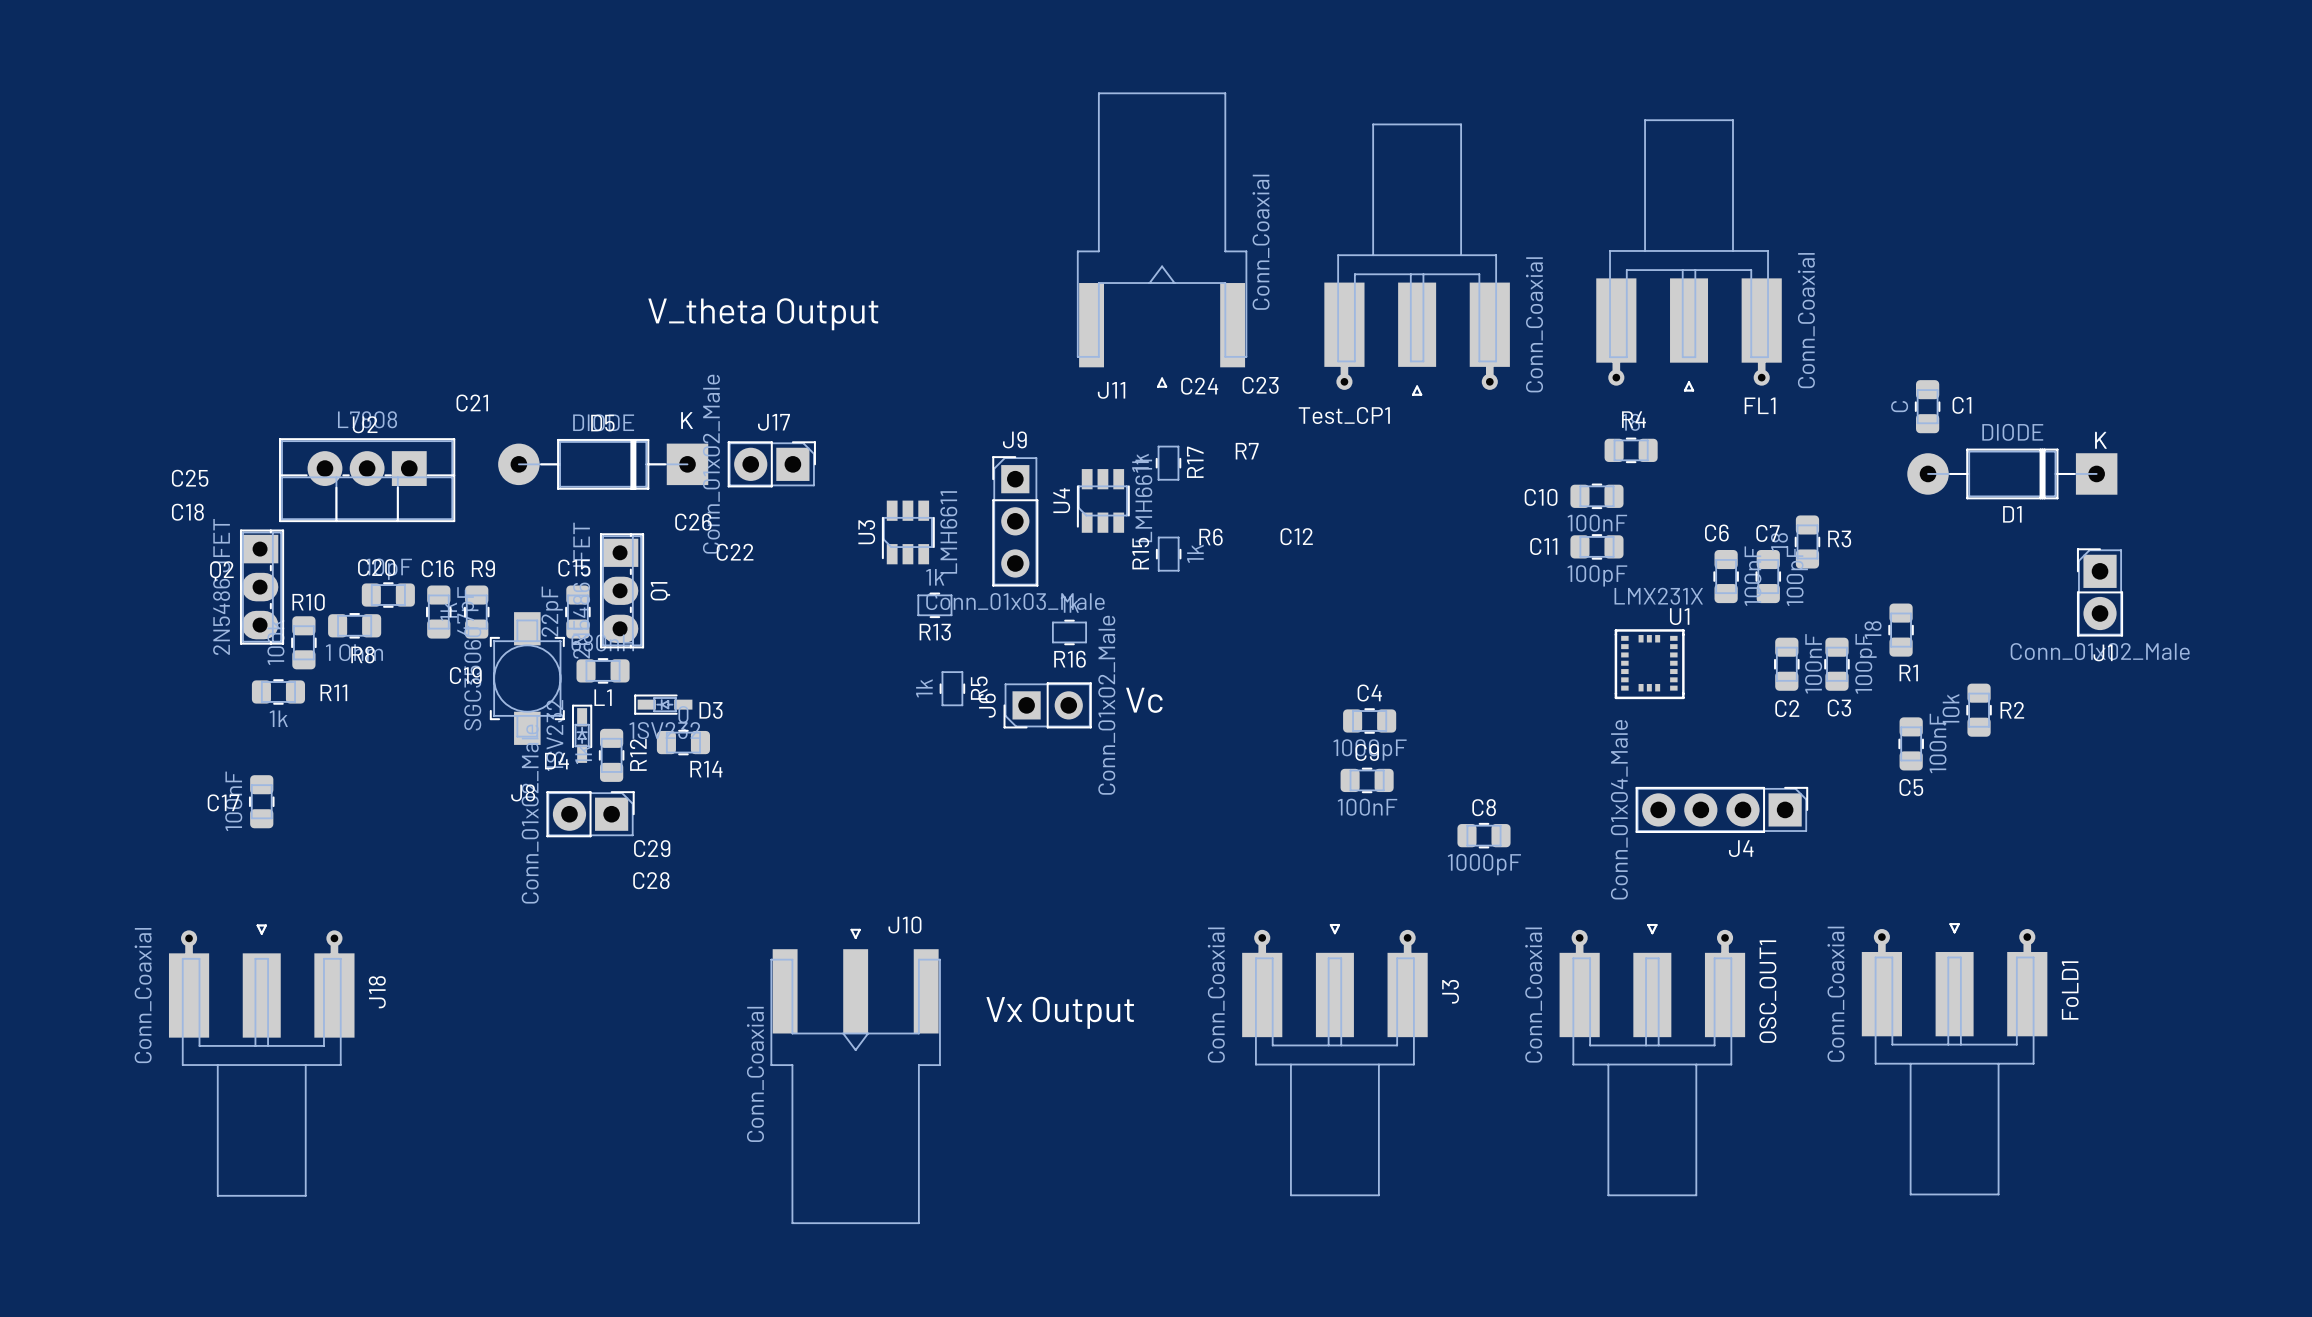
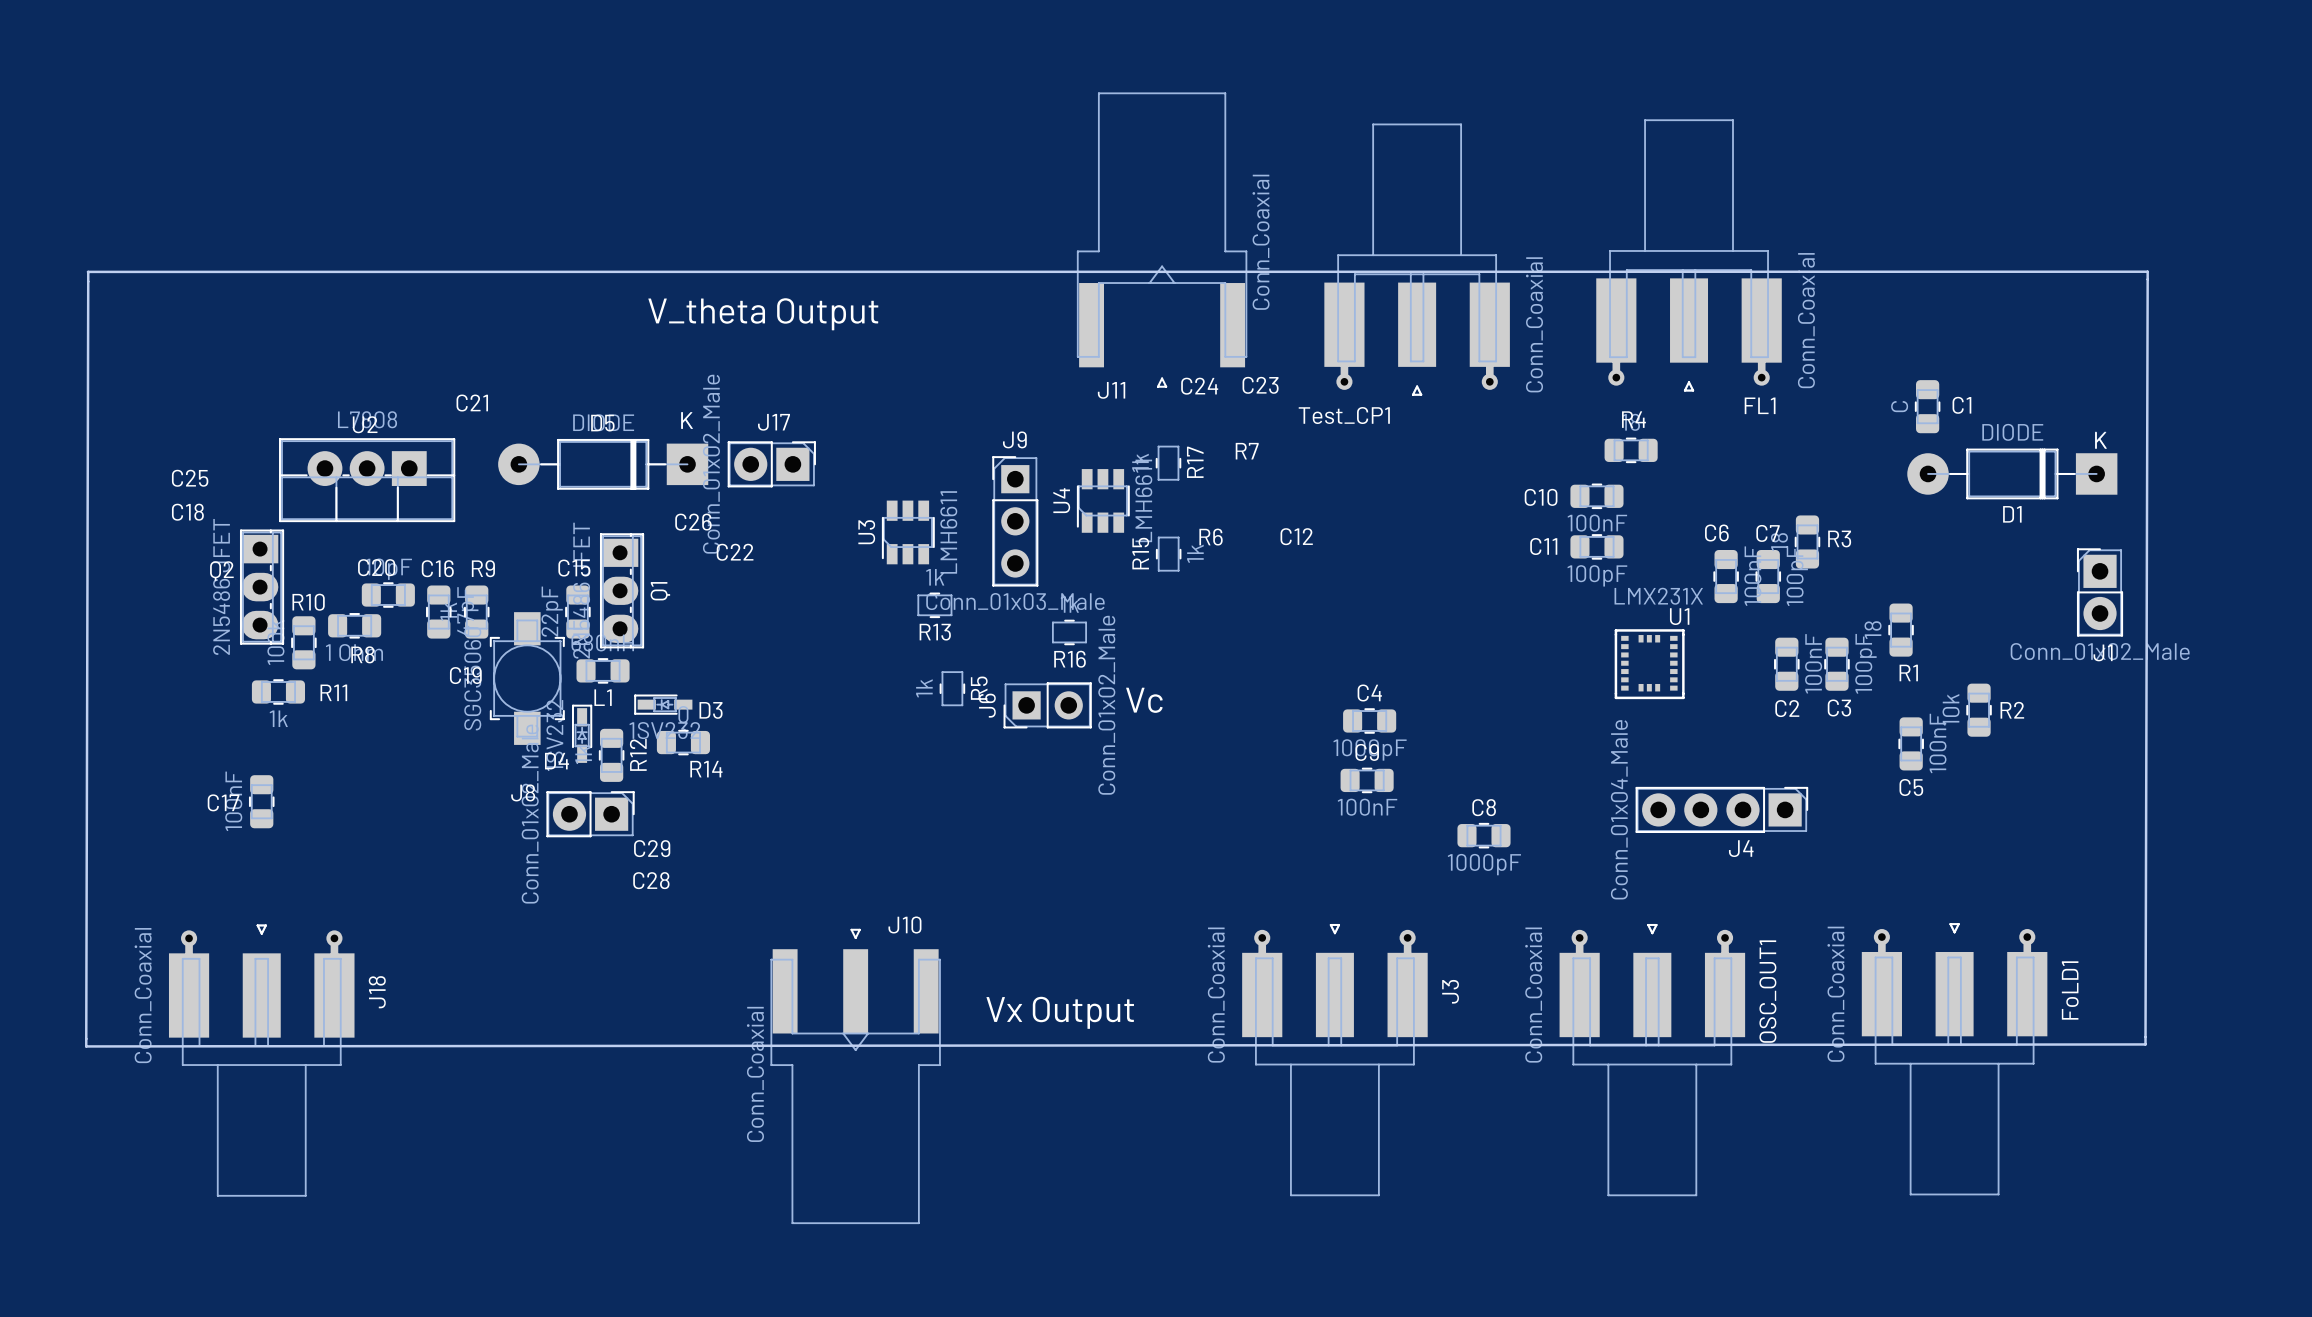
board edge: none -> (87, 271) (2147, 271) (2147, 279)
board edge: none -> (88, 271) (88, 281)
board edge: none -> (2147, 279) (2145, 1044) (86, 1046) (86, 1038)
board edge: none -> (88, 281) (86, 1038)

